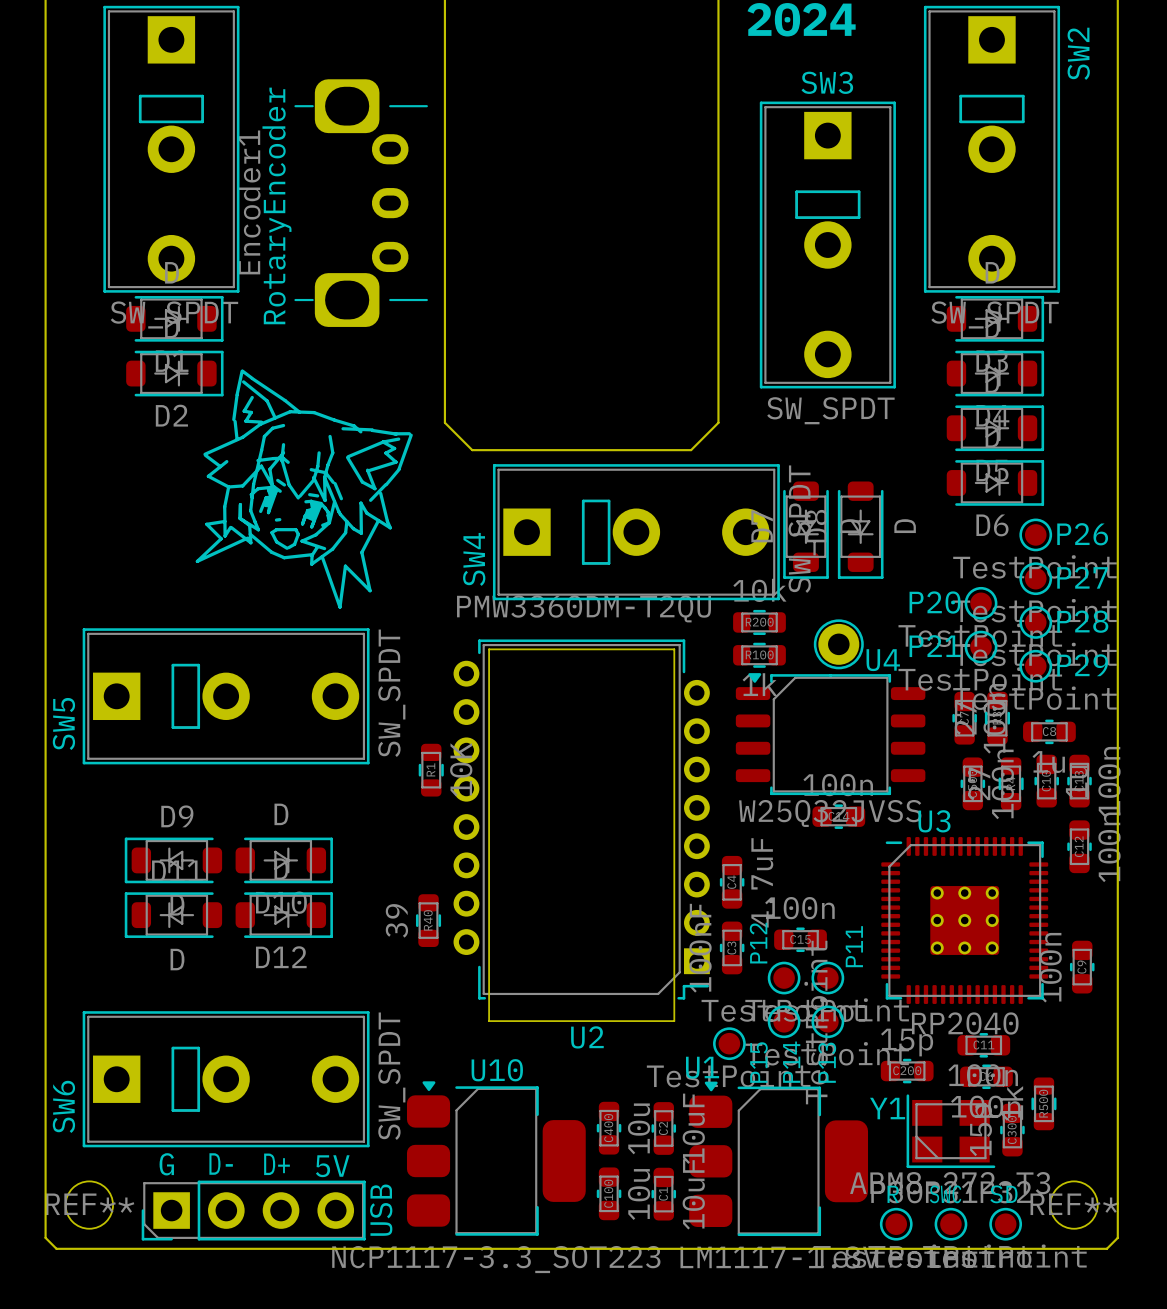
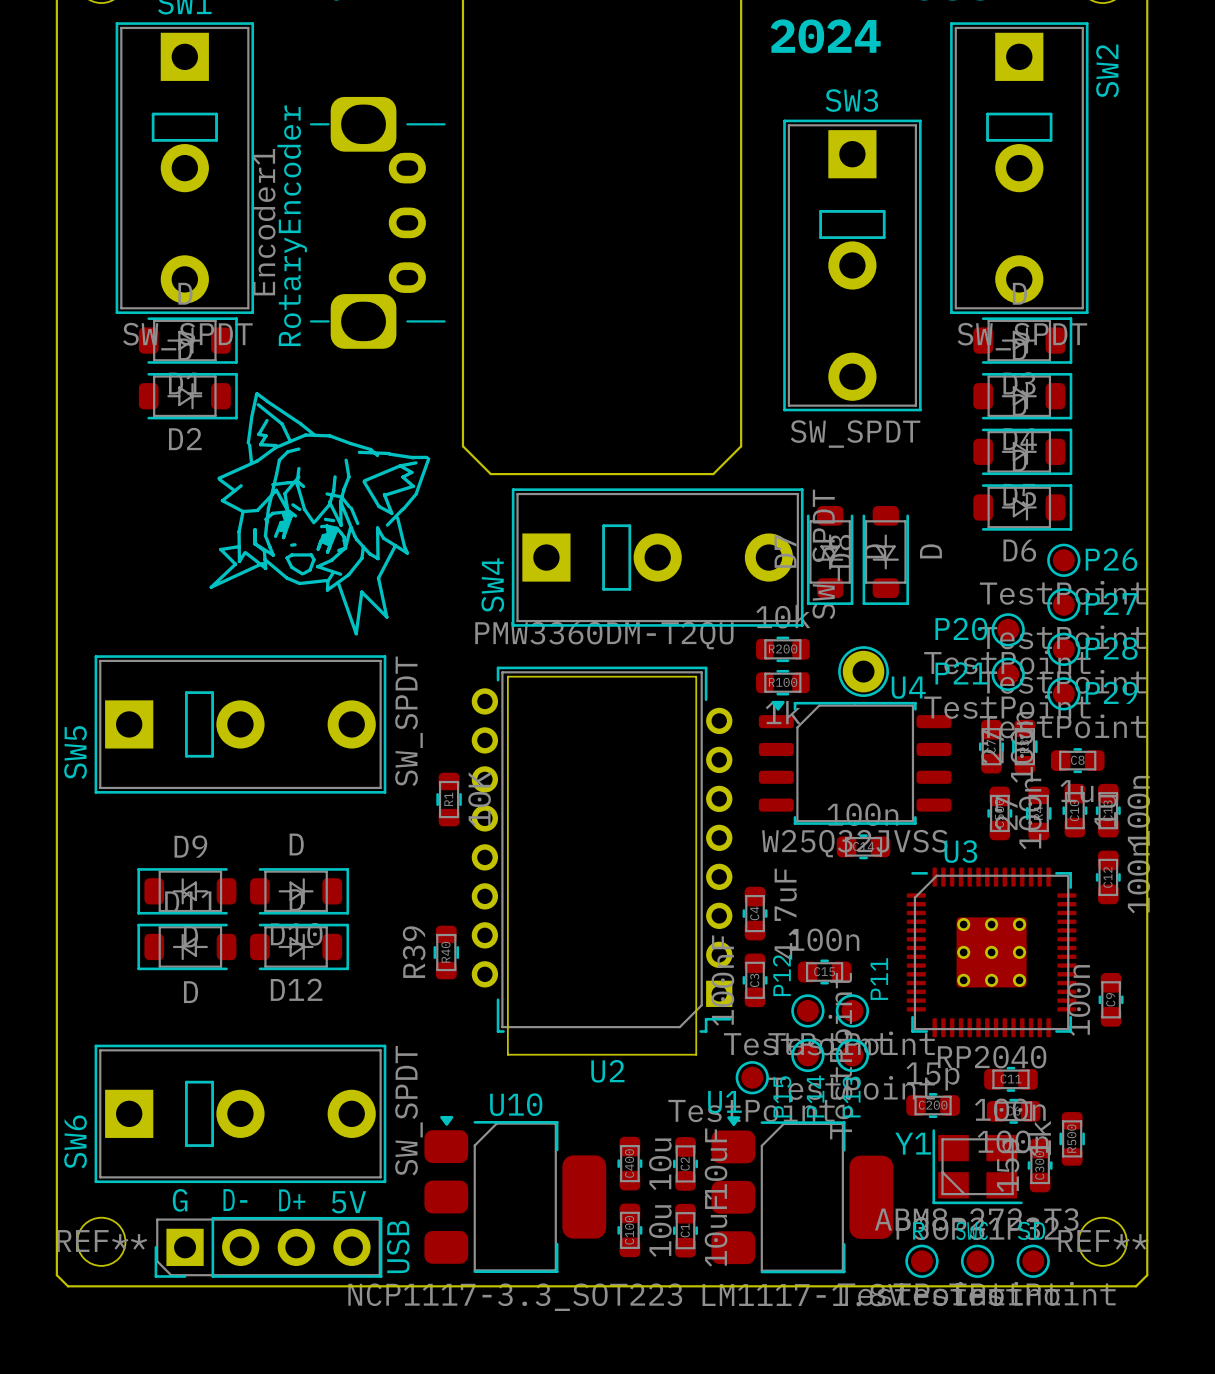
R40 value: 39 (396, 920) -> R39 (414, 952)

